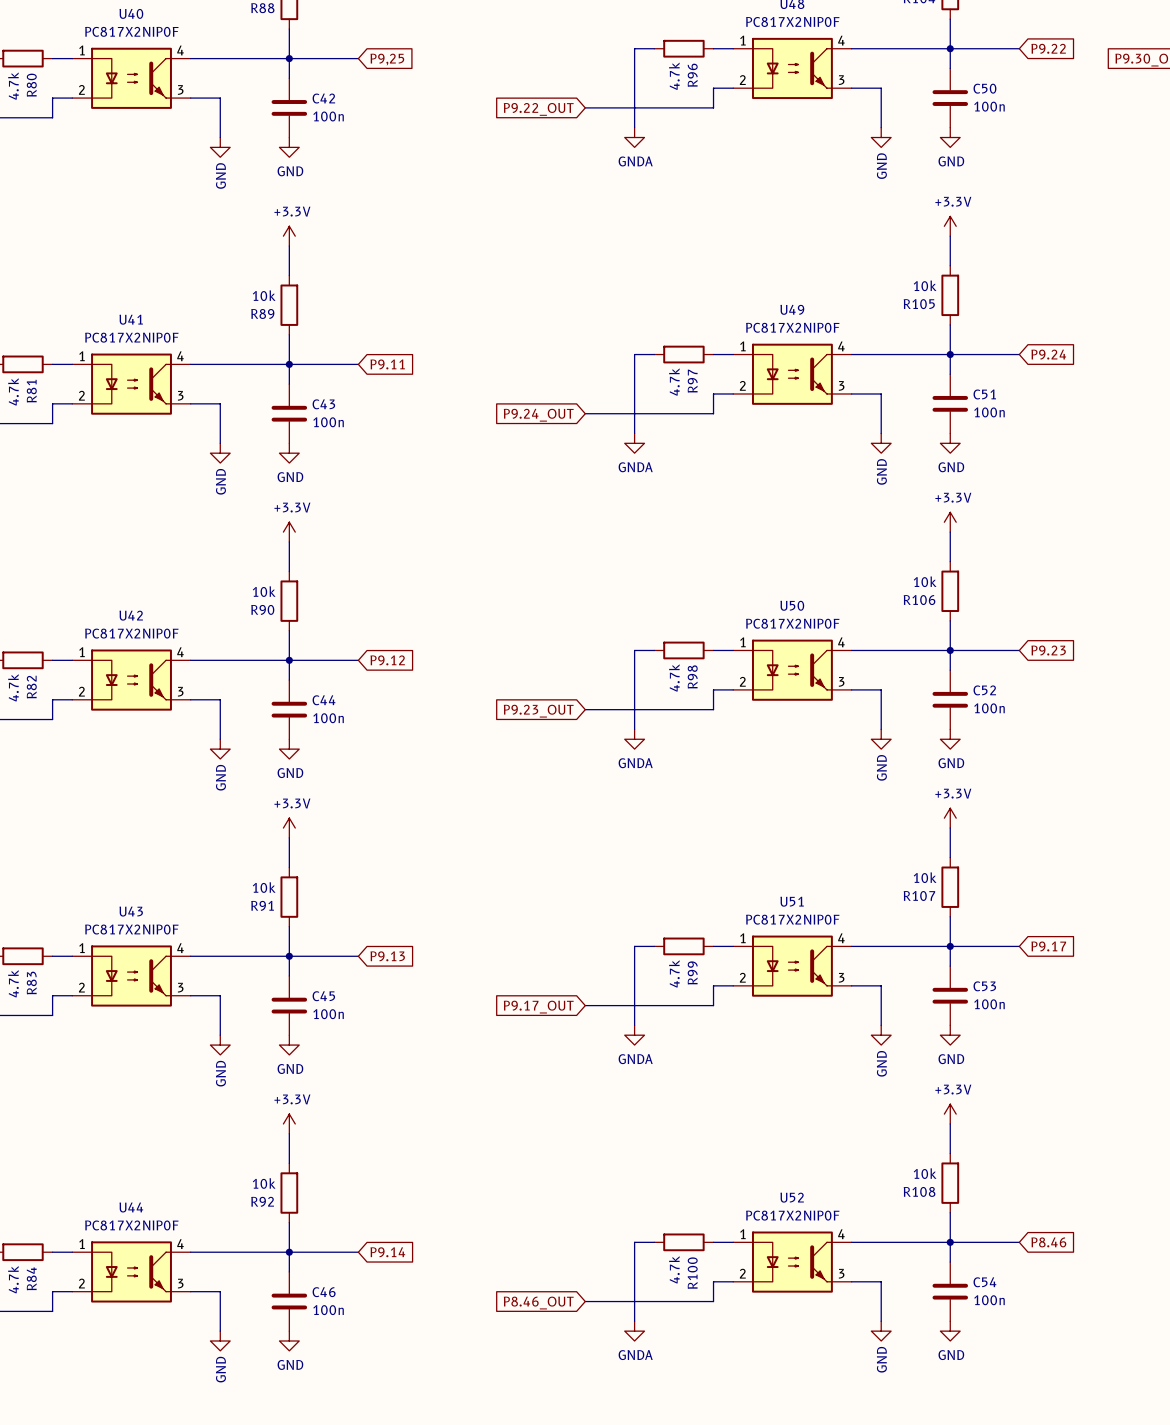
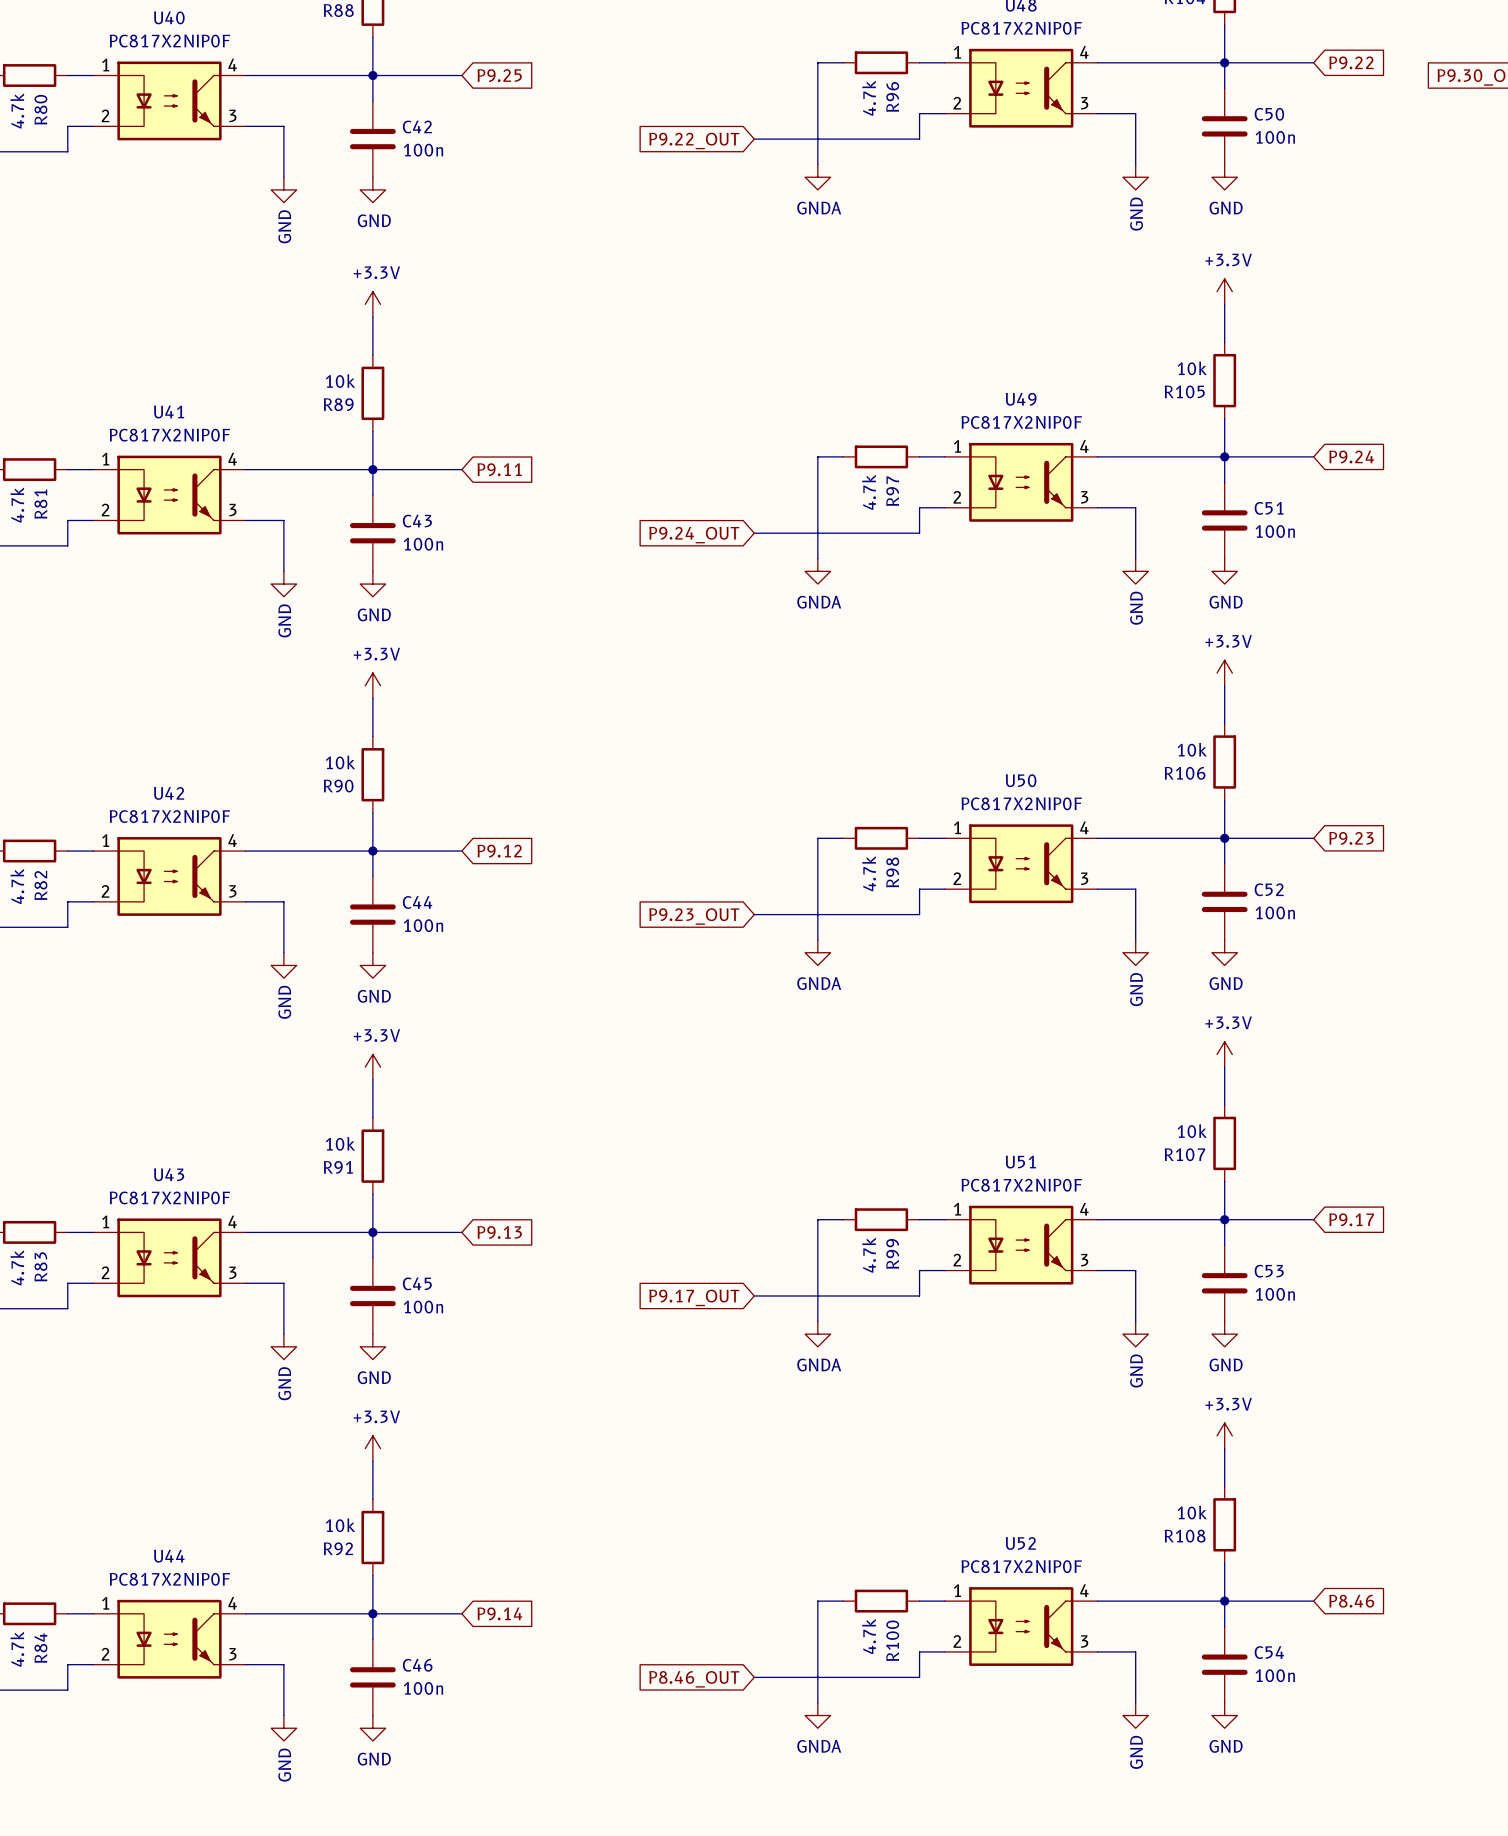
global label: P9,25 (387, 59) -> P9.25 (499, 75)

